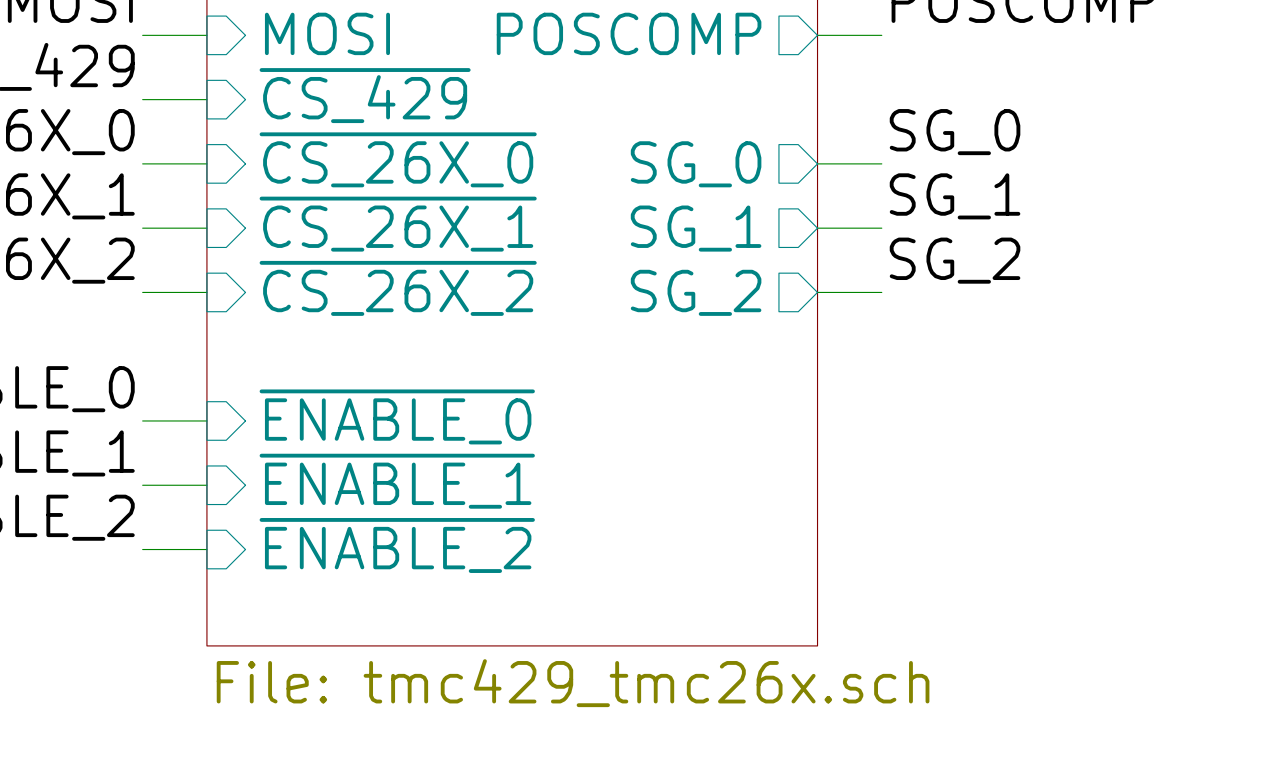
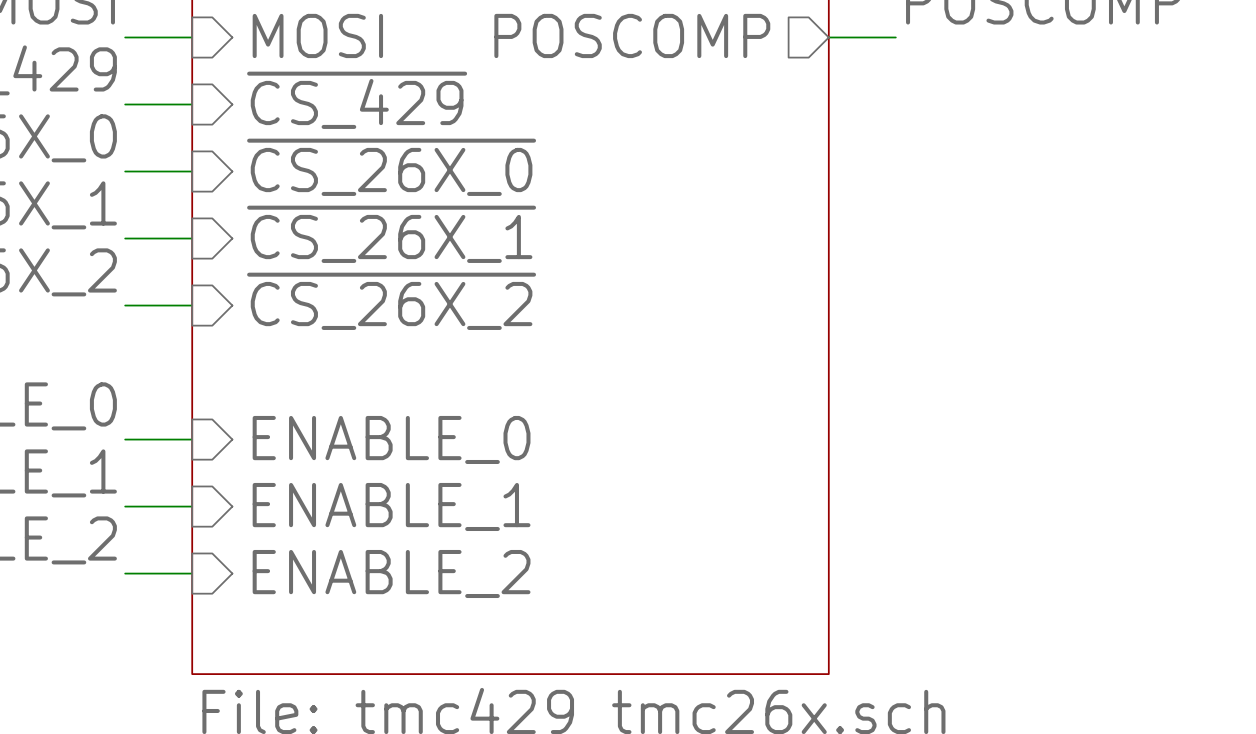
label: SG_0 (955, 132) -> none
wire: (817, 163) (881, 163) -> none
sheet pin: SG_0 (696, 164) -> none
label: SG_1 (955, 196) -> none
sheet pin: SG_1 (696, 228) -> none
wire: (817, 228) (881, 228) -> none
label: SG_2 (955, 260) -> none
sheet pin: SG_2 (696, 292) -> none
wire: (817, 292) (881, 292) -> none
sheet pin: ~{ENABLE_0} (397, 416) -> ENABLE_0 (391, 439)
sheet pin: ~{ENABLE_1} (397, 481) -> ENABLE_1 (391, 506)
sheet pin: ~{ENABLE_2} (397, 545) -> ENABLE_2 (391, 573)

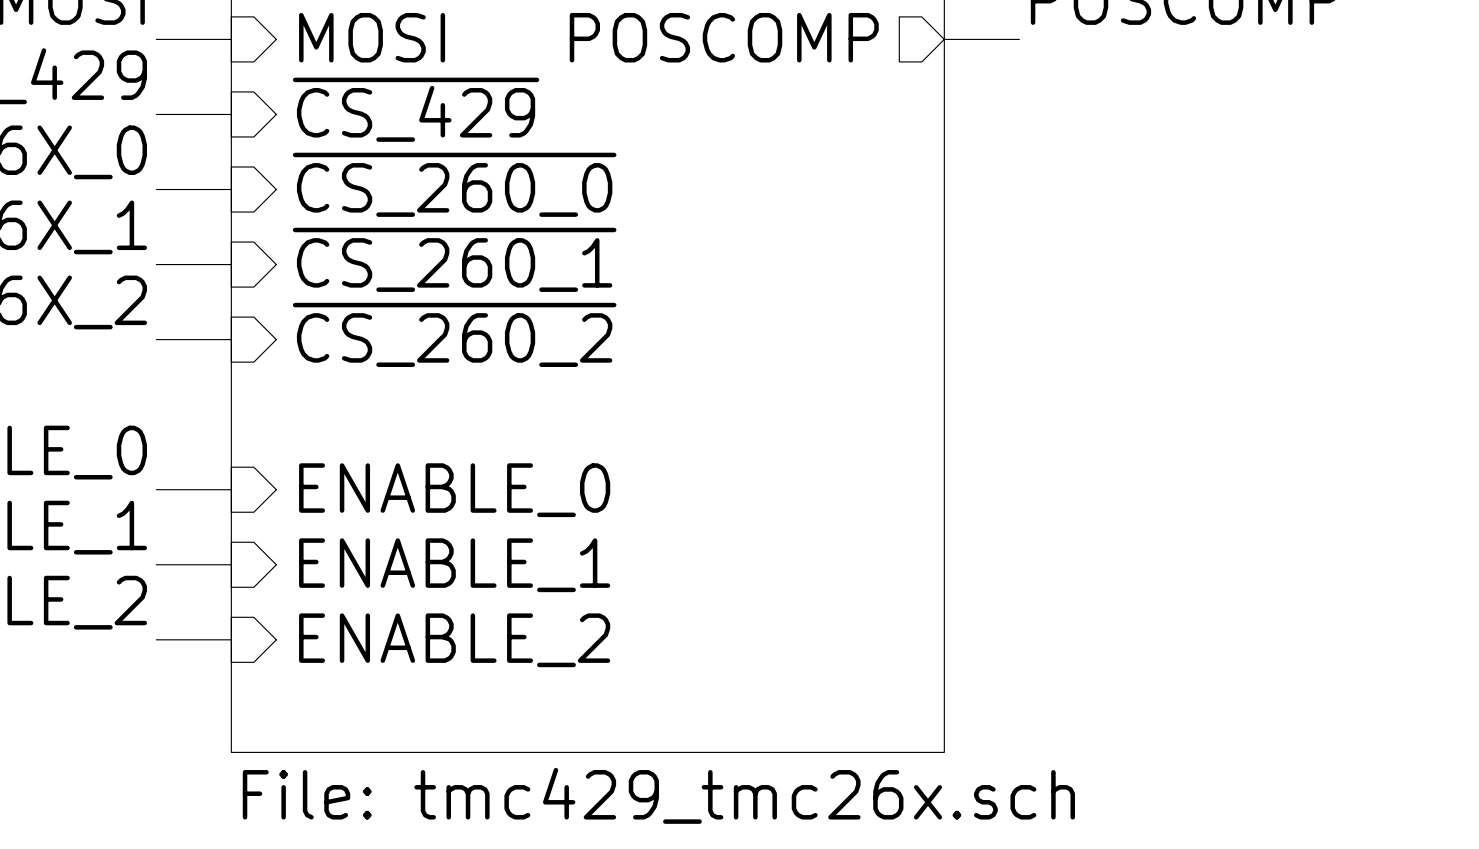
sheet pin: ~{CS_26X_0} (391, 167) -> ~{CS_260_0} (454, 184)
sheet pin: ~{CS_26X_1} (391, 234) -> ~{CS_260_1} (454, 259)
sheet pin: ~{CS_26X_2} (391, 301) -> ~{CS_260_2} (454, 334)

